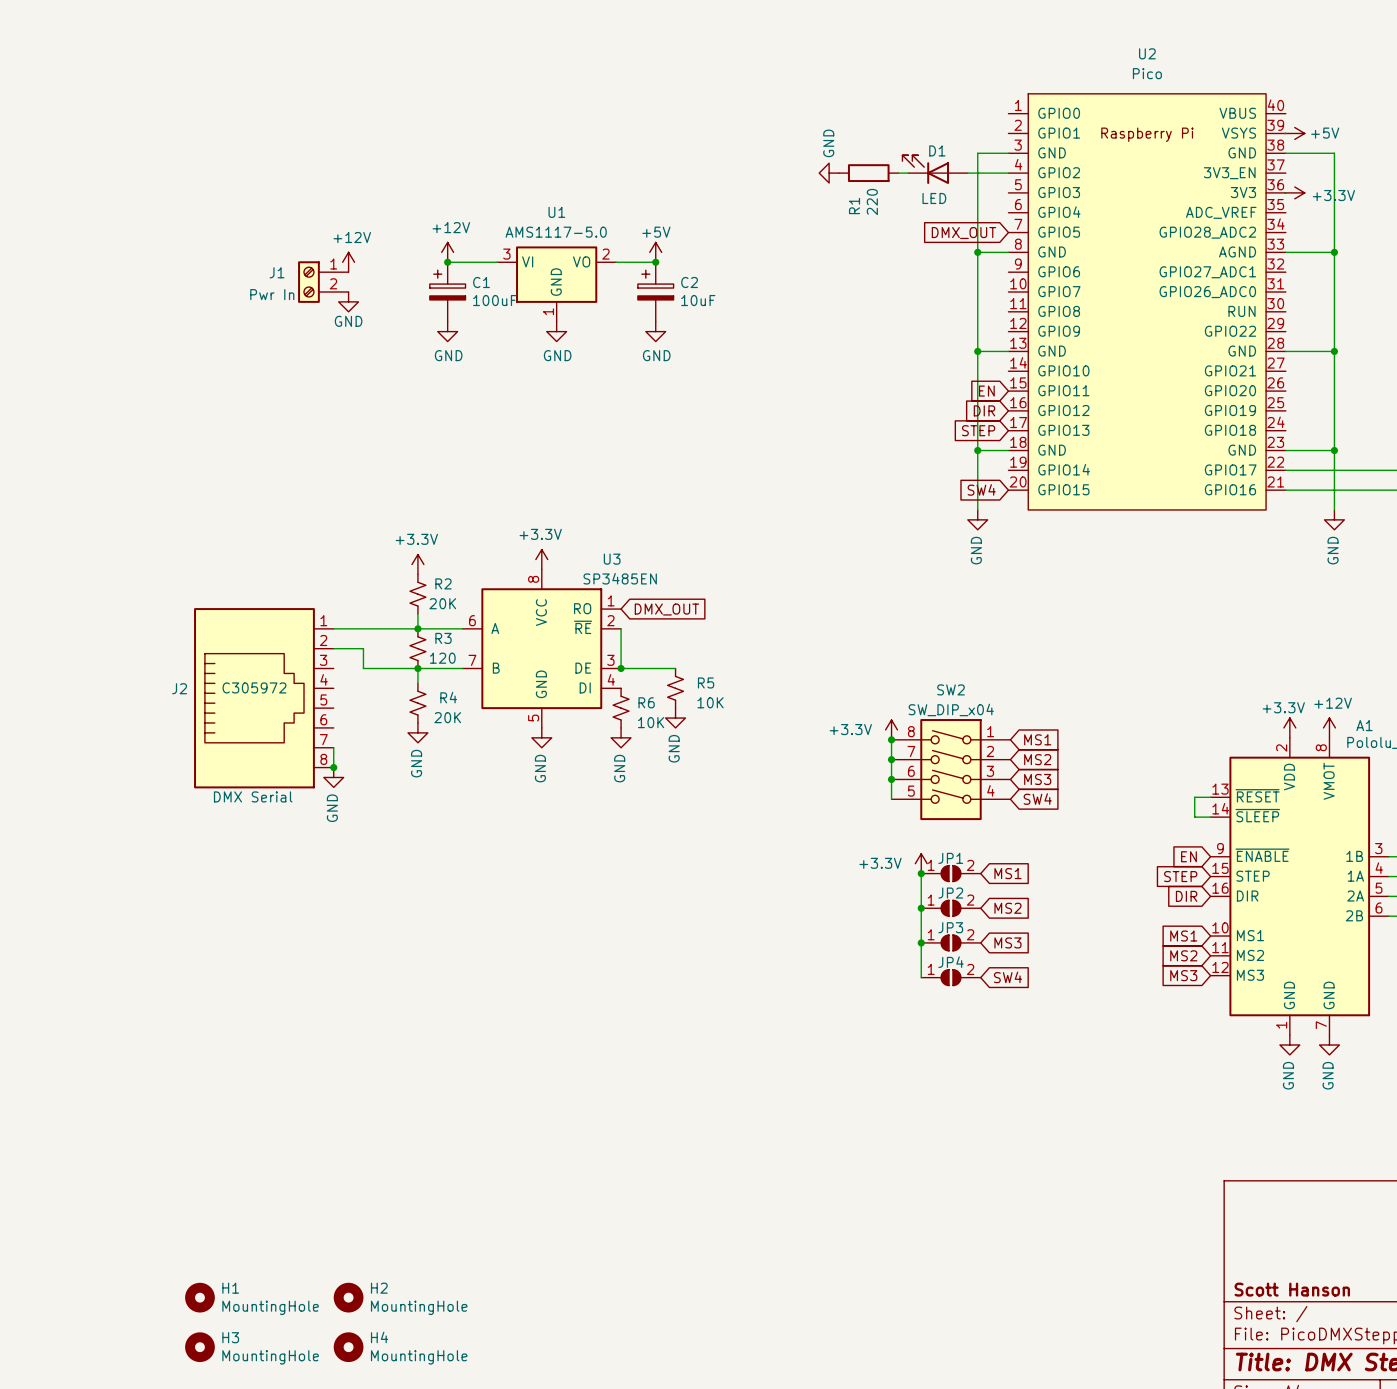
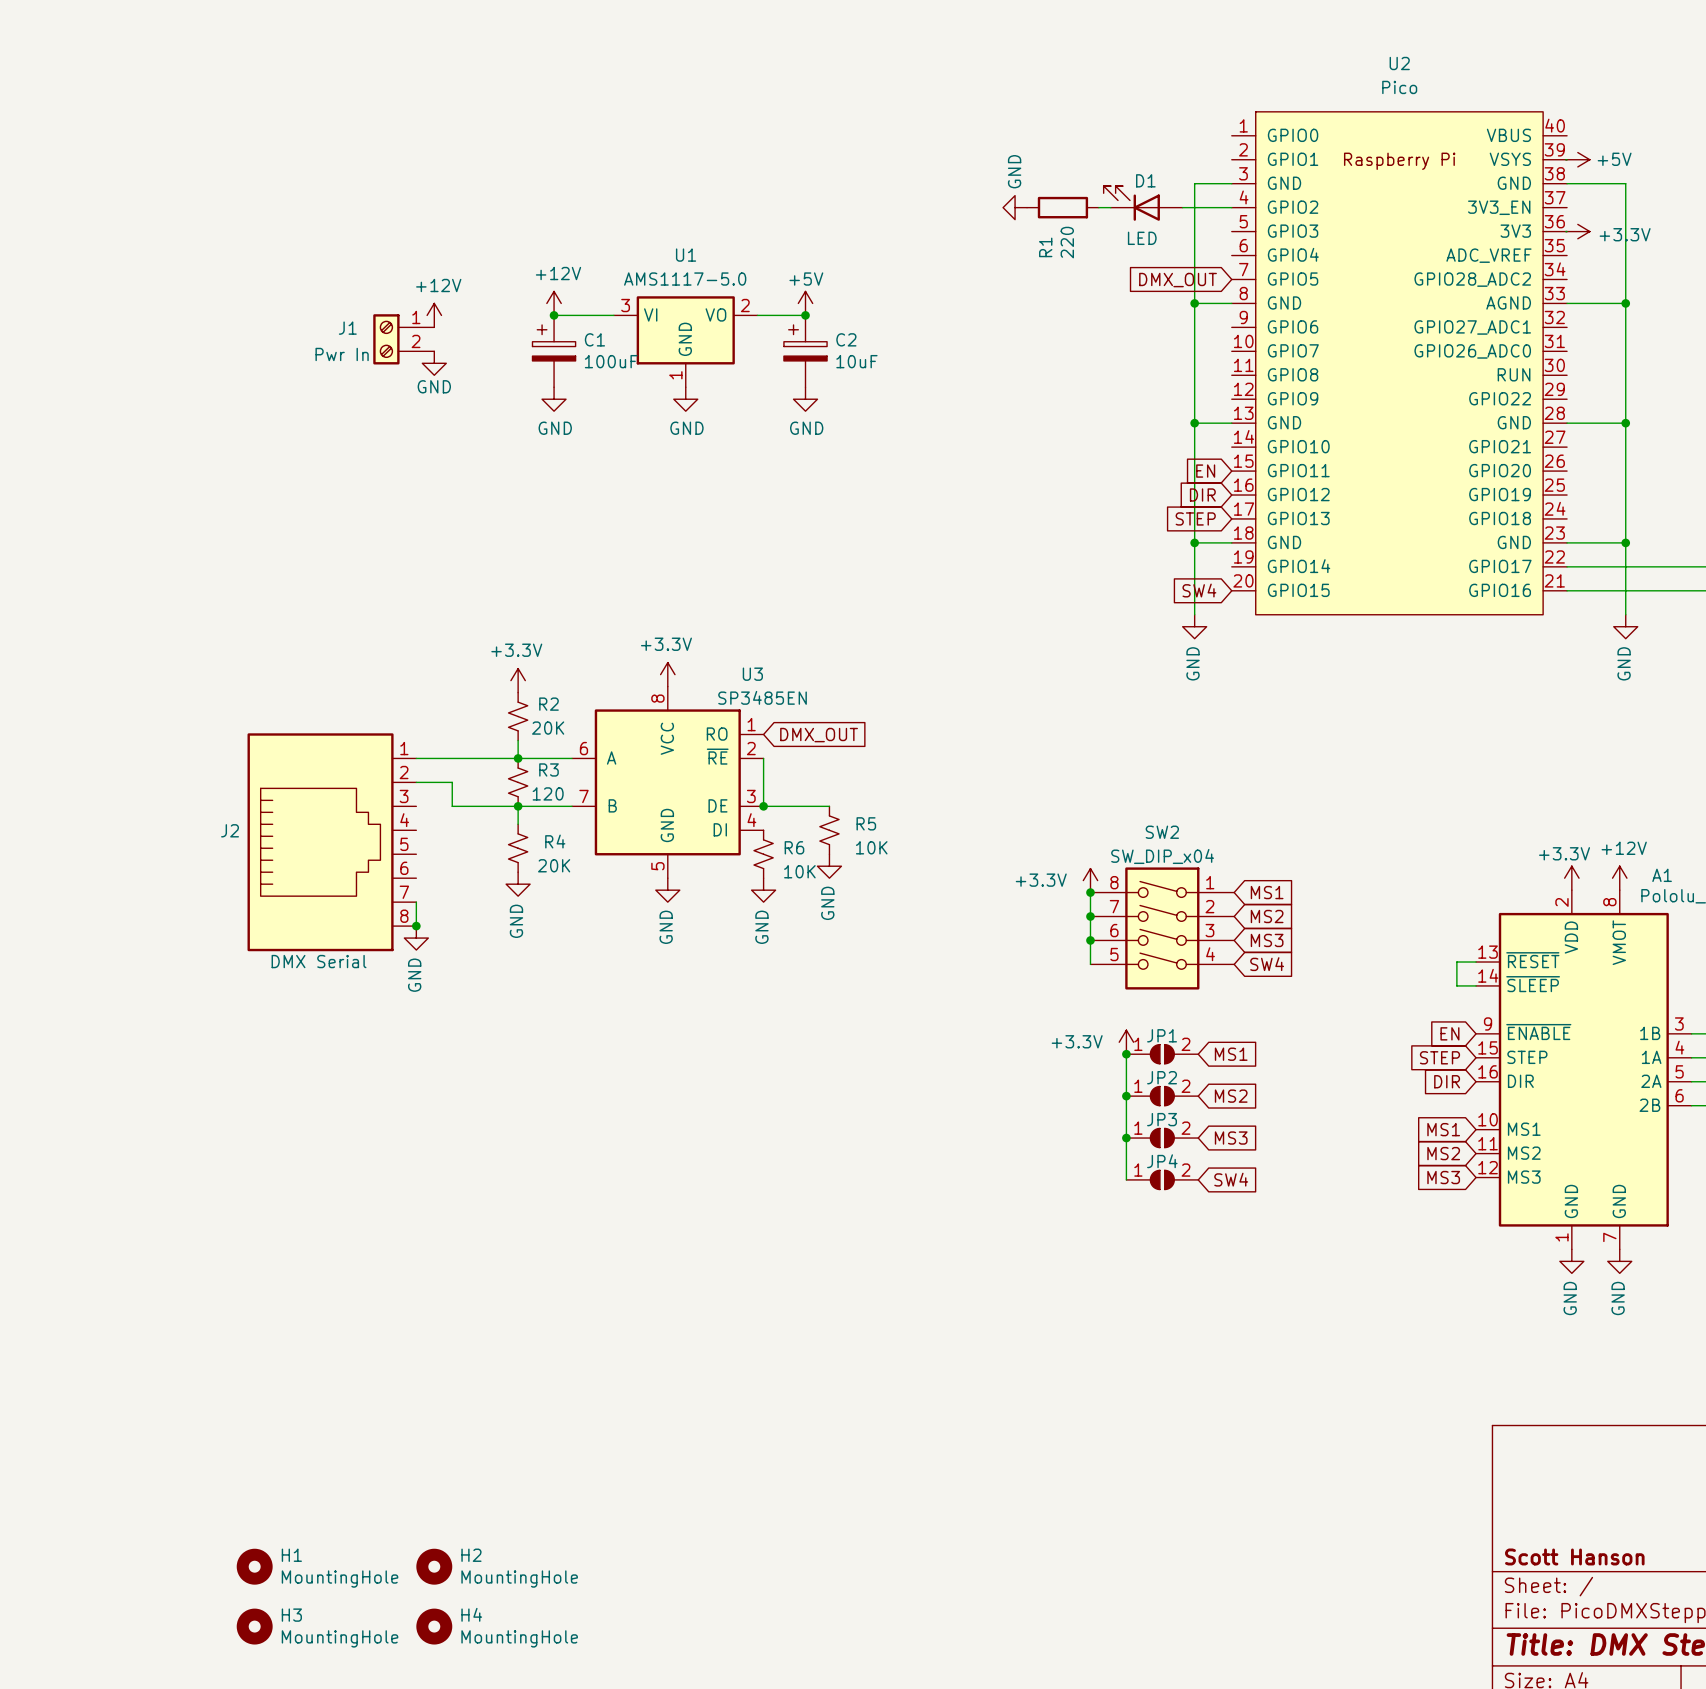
J2 text: C305972 (254, 687) -> none

